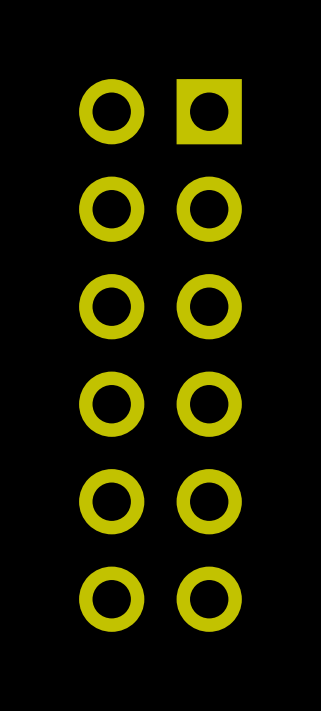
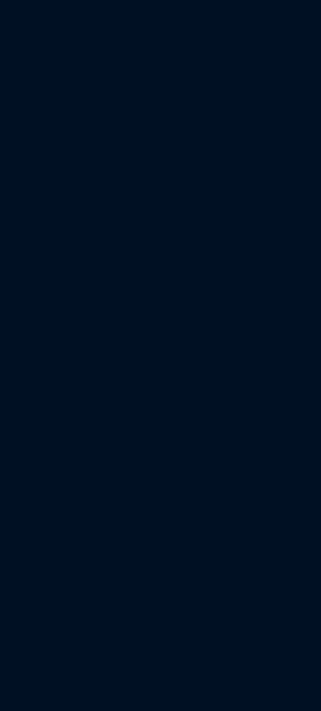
part: (160, 355) -> none

